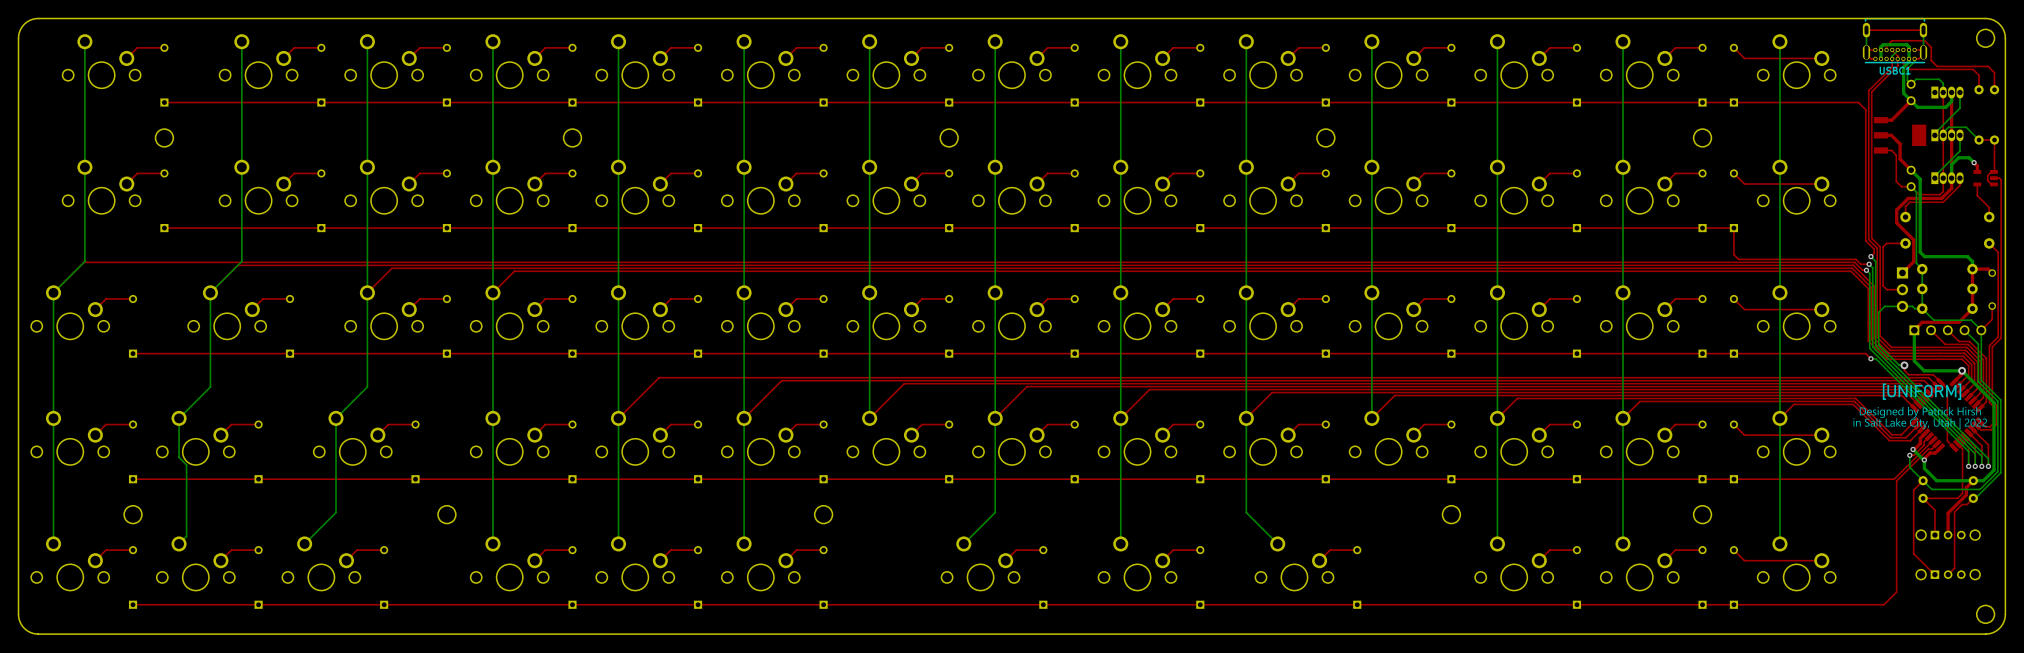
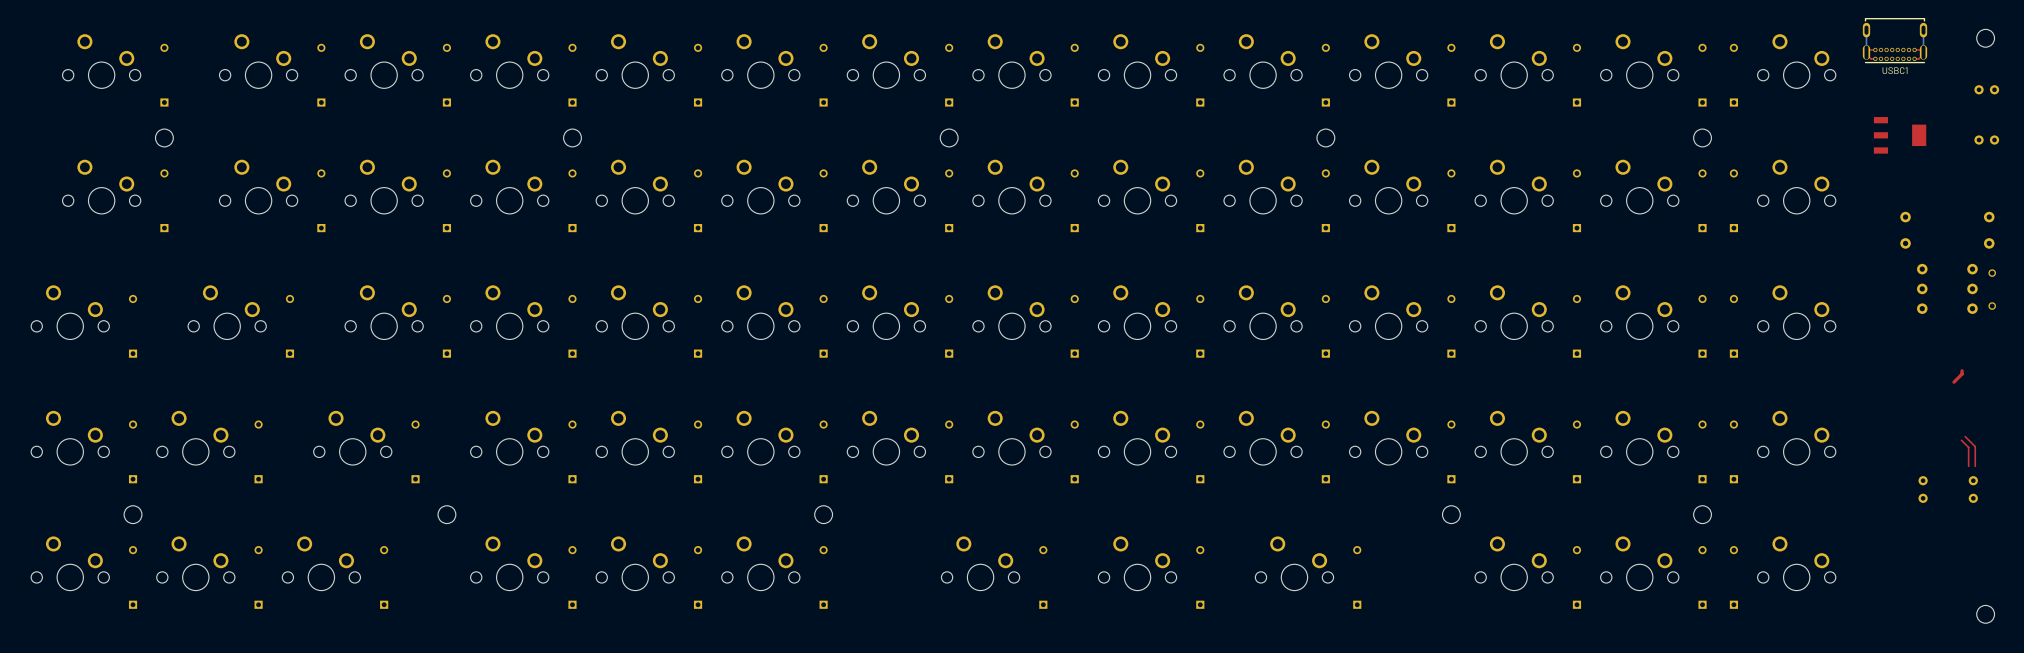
board edge: (1985, 18) (33, 19) (22, 26) (18, 38) (19, 619) (26, 630) (38, 634) (1990, 633) (2001, 626) (2005, 614) (2005, 38) (2003, 30) (1999, 24) (1993, 20) (1985, 18) -> none
top track: (1923, 30) (1866, 30) -> none
bottom track: (84, 41) (84, 261) (53, 292) (53, 543) -> none
bottom track: (241, 41) (241, 261) (210, 292) (210, 387) (179, 418) (179, 457) (186, 464) (186, 536) (179, 543) -> none
bottom track: (367, 41) (367, 387) (336, 418) (336, 512) (304, 543) -> none
bottom track: (492, 41) (492, 543) -> none
bottom track: (618, 41) (618, 543) -> none
bottom track: (744, 41) (744, 543) -> none
bottom track: (869, 41) (869, 418) -> none
bottom track: (995, 41) (995, 512) (963, 543) -> none
bottom track: (1120, 41) (1120, 543) -> none
bottom track: (1246, 41) (1246, 512) (1277, 543) -> none
bottom track: (1371, 41) (1371, 418) -> none
bottom track: (1497, 41) (1497, 543) -> none
bottom track: (1623, 41) (1623, 543) -> none
bottom track: (1779, 41) (1779, 543) -> none
top track: (164, 47) (137, 47) (126, 58) -> none
top track: (321, 47) (294, 47) (283, 58) -> none
top track: (446, 47) (419, 47) (409, 58) -> none
top track: (572, 47) (545, 47) (534, 58) -> none
top track: (698, 47) (670, 47) (660, 58) -> none
top track: (823, 47) (796, 47) (785, 58) -> none
top track: (949, 47) (922, 47) (911, 58) -> none
top track: (1074, 47) (1047, 47) (1037, 58) -> none
top track: (1200, 47) (1173, 47) (1162, 58) -> none
top track: (1325, 47) (1298, 47) (1288, 58) -> none
top track: (1451, 47) (1424, 47) (1413, 58) -> none
top track: (1576, 47) (1549, 47) (1539, 58) -> none
top track: (1702, 47) (1675, 47) (1664, 58) -> none
top track: (1733, 47) (1744, 58) (1821, 58) -> none
top track: (1886, 49) (1886, 46) (1892, 40) (1924, 40) (1931, 47) (1931, 60) (1937, 66) (1988, 66) (1994, 72) (1994, 89) -> none
top track: (1892, 50) (1897, 56) (1897, 65) (1871, 91) (1871, 238) (1880, 246) (1880, 335) (1891, 347) (1966, 347) (1980, 360) (1980, 392) (1972, 400) -> none
bottom track: (1897, 50) (1892, 56) (1892, 58) -> none
bottom track: (1880, 58) (1880, 46) (1883, 44) (1906, 44) (1909, 46) (1909, 61) (1903, 67) (1903, 93) (1917, 107) (1945, 107) (1951, 101) (1951, 92) -> none
top track: (1892, 58) (1892, 67) (1868, 90) (1868, 239) (1877, 248) (1877, 337) (1890, 350) (1965, 350) (1977, 362) (1977, 388) (1968, 397) -> none
top track: (1903, 58) (1903, 63) (1909, 69) (1973, 69) (1979, 75) (1979, 89) -> none
bottom track: (1914, 58) (1914, 61) (1907, 68) (1907, 80) (1911, 84) (1916, 79) (1939, 79) (1943, 83) (1943, 92) -> none
part: (1911, 92) -> none
top track: (1943, 92) (1943, 191) (1940, 194) (1919, 194) (1911, 186) (1901, 186) (1896, 181) (1896, 155) (1891, 150) (1880, 150) -> none
part: (1947, 92) -> none
top track: (1951, 92) (1951, 188) (1941, 198) (1908, 198) (1896, 210) (1896, 222) (1913, 240) (1913, 261) (1902, 272) -> none
bottom track: (1959, 92) (1959, 108) (1934, 135) -> none
top track: (1911, 100) (1891, 120) (1880, 120) -> none
top track: (164, 102) (1858, 102) (1865, 109) (1865, 240) (1874, 249) (1874, 253) (1870, 256) -> none
top track: (1880, 135) (1891, 135) (1900, 144) (1900, 159) (1911, 170) -> none
bottom track: (1943, 135) (1943, 132) (1948, 127) (1966, 127) (1979, 140) -> none
part: (1947, 135) -> none
bottom track: (1959, 135) (1959, 151) (1934, 178) -> none
top track: (1979, 140) (1994, 140) (1994, 171) (1987, 175) (1987, 180) (1993, 184) -> none
top track: (1974, 162) (1977, 165) (1977, 171) -> none
bottom track: (1974, 162) (1969, 157) (1958, 157) (1951, 164) (1951, 178) -> none
via: (1974, 162) -> none
bottom track: (1911, 170) (1920, 179) (1920, 252) (1924, 256) (1967, 256) (1972, 261) (1972, 269) -> none
top track: (164, 173) (137, 173) (126, 184) -> none
top track: (321, 173) (294, 173) (283, 184) -> none
top track: (446, 173) (419, 173) (409, 184) -> none
top track: (572, 173) (545, 173) (534, 184) -> none
top track: (698, 173) (670, 173) (660, 184) -> none
top track: (823, 173) (796, 173) (785, 184) -> none
top track: (949, 173) (922, 173) (911, 184) -> none
top track: (1074, 173) (1047, 173) (1037, 184) -> none
top track: (1200, 173) (1173, 173) (1162, 184) -> none
top track: (1325, 173) (1298, 173) (1288, 184) -> none
top track: (1451, 173) (1424, 173) (1413, 184) -> none
top track: (1576, 173) (1549, 173) (1539, 184) -> none
top track: (1702, 173) (1675, 173) (1664, 184) -> none
top track: (1733, 173) (1744, 184) (1821, 184) -> none
part: (1911, 178) -> none
part: (1947, 178) -> none
top track: (1959, 178) (1959, 185) (1943, 202) (1909, 202) (1905, 206) (1905, 217) -> none
part: (1985, 178) -> none
top track: (1993, 178) (2001, 179) (2001, 338) (1992, 347) (1992, 401) (1996, 405) (1996, 424) (1991, 429) (1980, 429) (1976, 425) -> none
top track: (1977, 184) (1977, 195) (1989, 207) (1989, 217) -> none
bottom track: (1911, 186) (1916, 191) (1916, 263) (1922, 269) (1922, 308) -> none
top track: (164, 228) (1733, 228) (1733, 254) (1738, 259) (1855, 259) (1860, 264) (1869, 264) -> none
top track: (1905, 243) (1886, 243) (1883, 247) (1883, 285) (1886, 289) (1902, 289) -> none
top track: (1989, 243) (1998, 252) (1998, 337) (1989, 345) (1989, 402) (1993, 406) (1993, 423) (1990, 426) (1985, 426) (1980, 421) -> none
bottom track: (1870, 256) (1875, 261) (1875, 346) (1988, 458) (1988, 466) -> none
via: (1870, 256) -> none
bottom track: (1869, 264) (1872, 267) (1872, 347) (1981, 456) (1981, 466) -> none
via: (1869, 264) -> none
top track: (1866, 270) (1862, 270) (1854, 262) (83, 262) (53, 292) -> none
bottom track: (1866, 270) (1869, 273) (1869, 348) (1975, 453) (1975, 466) -> none
via: (1866, 270) -> none
top track: (1992, 273) (1988, 269) (1972, 269) (1972, 308) (1958, 322) (1922, 322) (1914, 330) -> none
part: (1902, 289) -> none
top track: (210, 292) (237, 265) (1853, 265) (1874, 286) (1874, 338) (1889, 353) (1964, 353) (1974, 363) (1974, 383) (1965, 393) -> none
top track: (367, 292) (391, 268) (1852, 268) (1871, 287) (1871, 339) (1887, 356) (1963, 356) (1971, 364) (1971, 379) (1961, 389) -> none
top track: (492, 292) (514, 271) (1850, 271) (1868, 288) (1868, 340) (1886, 359) (1962, 359) (1968, 365) (1968, 374) (1957, 385) -> none
top track: (133, 298) (105, 298) (95, 309) -> none
top track: (289, 298) (262, 298) (252, 309) -> none
top track: (446, 298) (419, 298) (409, 309) -> none
top track: (572, 298) (545, 298) (534, 309) -> none
top track: (698, 298) (670, 298) (660, 309) -> none
top track: (823, 298) (796, 298) (785, 309) -> none
top track: (949, 298) (922, 298) (911, 309) -> none
top track: (1074, 298) (1047, 298) (1037, 309) -> none
top track: (1200, 298) (1173, 298) (1162, 309) -> none
top track: (1325, 298) (1298, 298) (1288, 309) -> none
top track: (1451, 298) (1424, 298) (1413, 309) -> none
top track: (1576, 298) (1549, 298) (1539, 309) -> none
top track: (1702, 298) (1675, 298) (1664, 309) -> none
top track: (1733, 298) (1744, 309) (1821, 309) -> none
top track: (1992, 306) (1992, 319) (1981, 330) -> none
bottom track: (1922, 308) (1933, 320) (1971, 320) (1981, 330) (1981, 380) (2000, 399) (2000, 472) (1973, 498) -> none
bottom track: (1922, 308) (1914, 308) (1912, 306) (1884, 306) (1878, 312) (1878, 344) (1899, 365) (1904, 365) -> none
bottom track: (1914, 330) (1914, 361) (1924, 370) (1962, 370) (1994, 402) (1994, 470) (1983, 480) (1936, 480) (1924, 468) (1924, 460) (1913, 449) -> none
top track: (1931, 330) (1945, 344) (1968, 344) (1983, 359) (1983, 397) (1976, 404) -> none
top track: (1947, 330) (1959, 341) (1969, 341) (1986, 358) (1986, 401) (1980, 408) -> none
part: (1947, 330) -> none
bottom track: (1964, 330) (1978, 344) (1978, 381) (1997, 401) (1997, 471) (1980, 489) (1931, 489) (1909, 467) (1909, 455) -> none
top track: (133, 353) (1865, 353) (1870, 358) -> none
bottom track: (1870, 358) (1875, 358) (1968, 451) (1968, 466) -> none
via: (1870, 358) -> none
top track: (1904, 365) (1904, 370) (1908, 374) (1933, 374) (1947, 388) (1947, 441) (1954, 447) -> none
via: (1904, 365) -> none
via: (1962, 370) -> none
drawing: [1853, 383, 1988, 430] -> none
top track: (1936, 385) (1928, 377) (659, 377) (618, 418) -> none
top track: (1933, 389) (1924, 380) (781, 380) (744, 418) -> none
top track: (1929, 393) (1919, 383) (904, 383) (869, 418) -> none
top track: (1925, 397) (1915, 386) (1026, 386) (995, 418) -> none
top track: (1921, 400) (1910, 389) (1149, 389) (1120, 418) -> none
top track: (1918, 404) (1906, 392) (1272, 392) (1246, 418) -> none
top track: (1914, 408) (1901, 395) (1394, 395) (1371, 418) -> none
part: (1947, 414) -> none
top track: (1497, 418) (1517, 398) (1855, 398) (1891, 434) (1901, 434) (1914, 421) -> none
top track: (1623, 418) (1639, 401) (1854, 401) (1890, 437) (1905, 437) (1918, 425) -> none
top track: (1779, 418) (1793, 404) (1853, 404) (1889, 440) (1910, 440) (1921, 429) -> none
top track: (133, 424) (105, 424) (95, 435) -> none
top track: (258, 424) (231, 424) (220, 435) -> none
top track: (415, 424) (388, 424) (377, 435) -> none
top track: (572, 424) (545, 424) (534, 435) -> none
top track: (698, 424) (670, 424) (660, 435) -> none
top track: (823, 424) (796, 424) (785, 435) -> none
top track: (949, 424) (922, 424) (911, 435) -> none
top track: (1074, 424) (1047, 424) (1037, 435) -> none
top track: (1200, 424) (1173, 424) (1162, 435) -> none
top track: (1325, 424) (1298, 424) (1288, 435) -> none
top track: (1451, 424) (1424, 424) (1413, 435) -> none
top track: (1576, 424) (1549, 424) (1539, 435) -> none
top track: (1702, 424) (1675, 424) (1664, 435) -> none
top track: (1733, 424) (1744, 435) (1821, 435) -> none
top track: (1972, 429) (1988, 444) (1988, 466) -> none
top track: (1925, 432) (1920, 438) (1920, 443) (1913, 449) -> none
top track: (1968, 432) (1981, 445) (1981, 466) -> none
top track: (1929, 436) (1913, 455) (1909, 455) -> none
top track: (1933, 440) (1894, 479) (133, 479) -> none
top track: (1936, 444) (1931, 449) (1928, 449) (1896, 481) (1896, 592) (1883, 604) (133, 604) -> none
top track: (1957, 444) (1962, 448) (1962, 493) (1957, 498) (1923, 498) (1934, 510) (1934, 535) -> none
top track: (1940, 447) (1935, 453) (1929, 453) (1924, 460) -> none
via: (1913, 449) -> none
via: (1909, 455) -> none
via: (1924, 460) -> none
via: (1968, 466) -> none
via: (1975, 466) -> none
via: (1981, 466) -> none
via: (1988, 466) -> none
top track: (1923, 480) (1913, 490) (1913, 553) (1934, 574) -> none
top track: (1973, 480) (1966, 487) (1966, 494) (1948, 513) (1948, 535) -> none
top track: (1973, 498) (1967, 504) (1962, 504) (1954, 512) (1954, 568) (1948, 574) -> none
part: (1948, 535) -> none
top track: (133, 550) (105, 550) (95, 560) -> none
top track: (258, 550) (231, 550) (220, 560) -> none
top track: (384, 550) (357, 550) (346, 560) -> none
top track: (572, 550) (545, 550) (534, 560) -> none
top track: (698, 550) (670, 550) (660, 560) -> none
top track: (823, 550) (796, 550) (785, 560) -> none
top track: (1043, 550) (1016, 550) (1005, 560) -> none
top track: (1200, 550) (1173, 550) (1162, 560) -> none
top track: (1357, 550) (1330, 550) (1319, 560) -> none
top track: (1576, 550) (1549, 550) (1539, 560) -> none
top track: (1702, 550) (1675, 550) (1664, 560) -> none
top track: (1733, 550) (1744, 560) (1821, 560) -> none
part: (1948, 574) -> none

